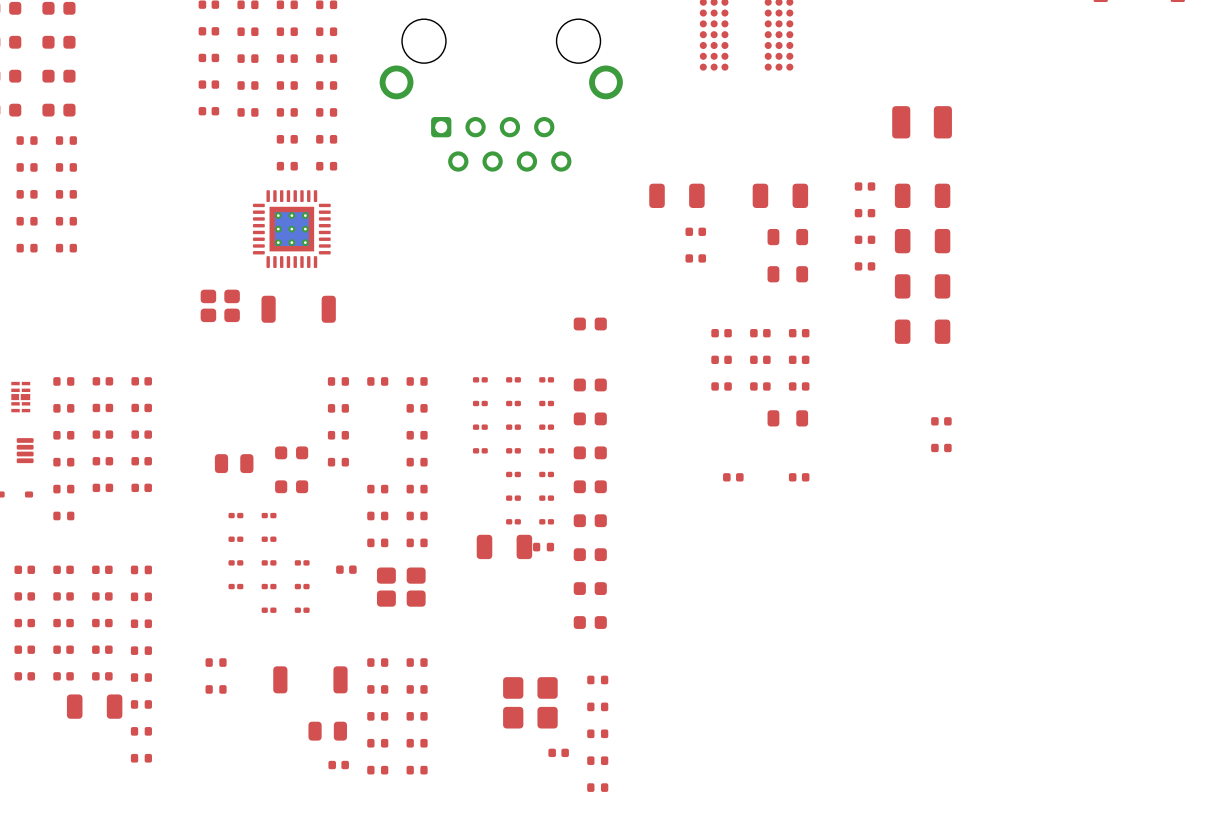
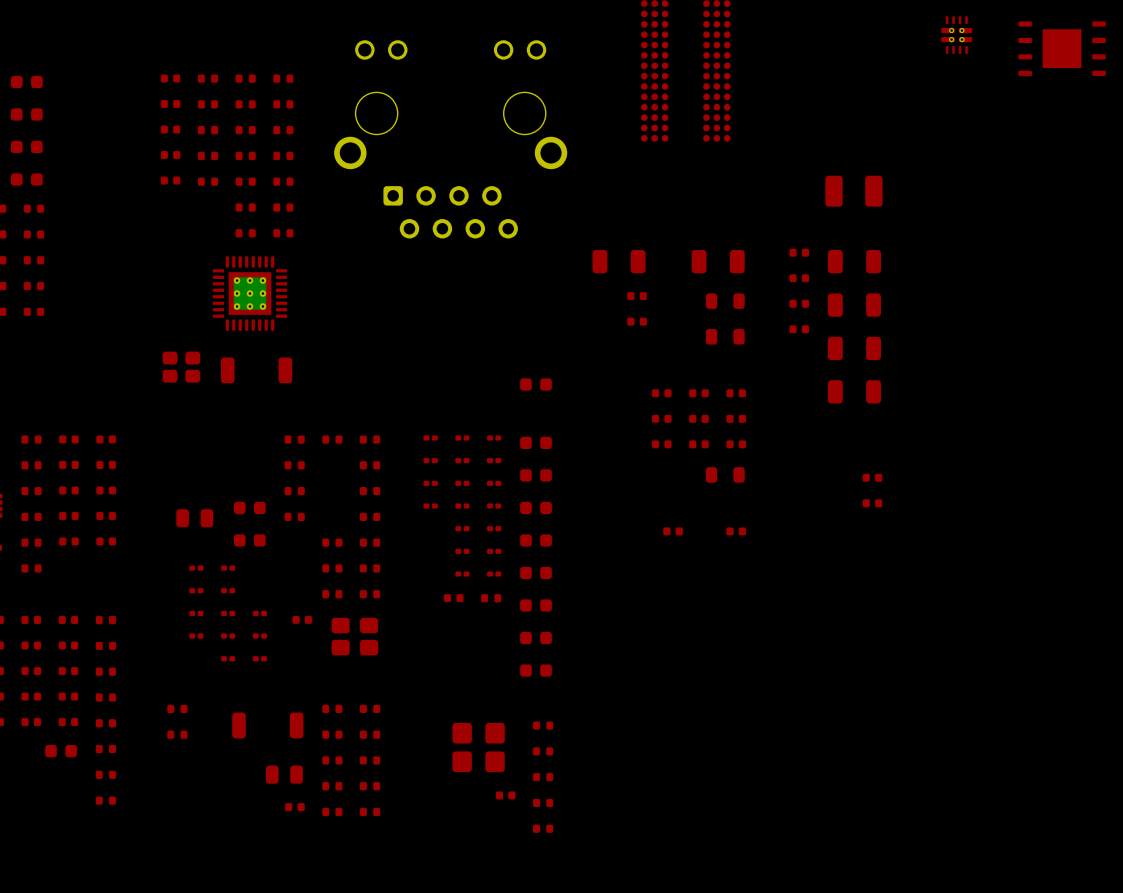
part footprint: [476, 534, 533, 560] -> [443, 594, 464, 603]
part footprint: [66, 694, 123, 719] -> [45, 744, 77, 758]

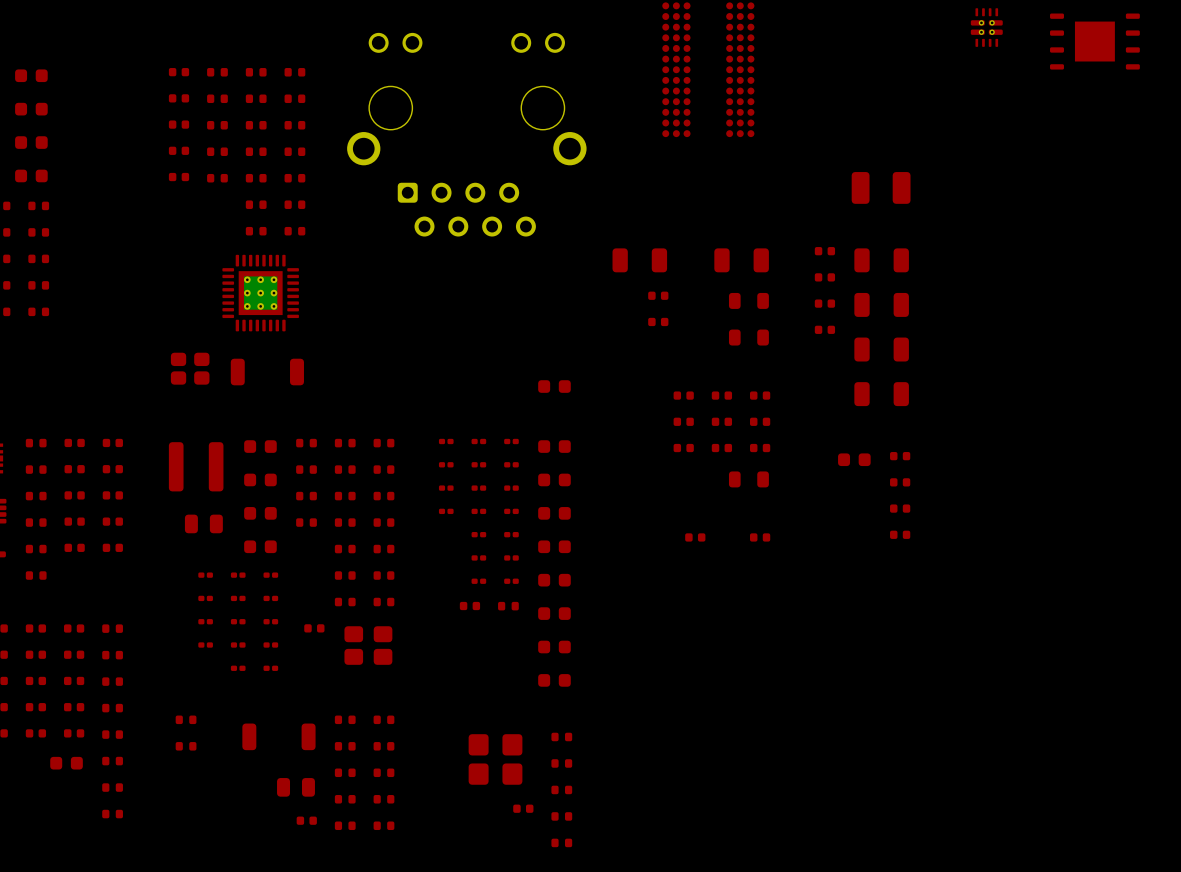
part: none -> (260, 446)
part: none -> (900, 456)
part: none -> (854, 459)
part: none -> (196, 466)
part: none -> (345, 469)
part: none -> (260, 479)
part: none -> (345, 496)
part: none -> (345, 522)
part: none -> (900, 534)
part: none -> (270, 575)
part: none -> (270, 598)

